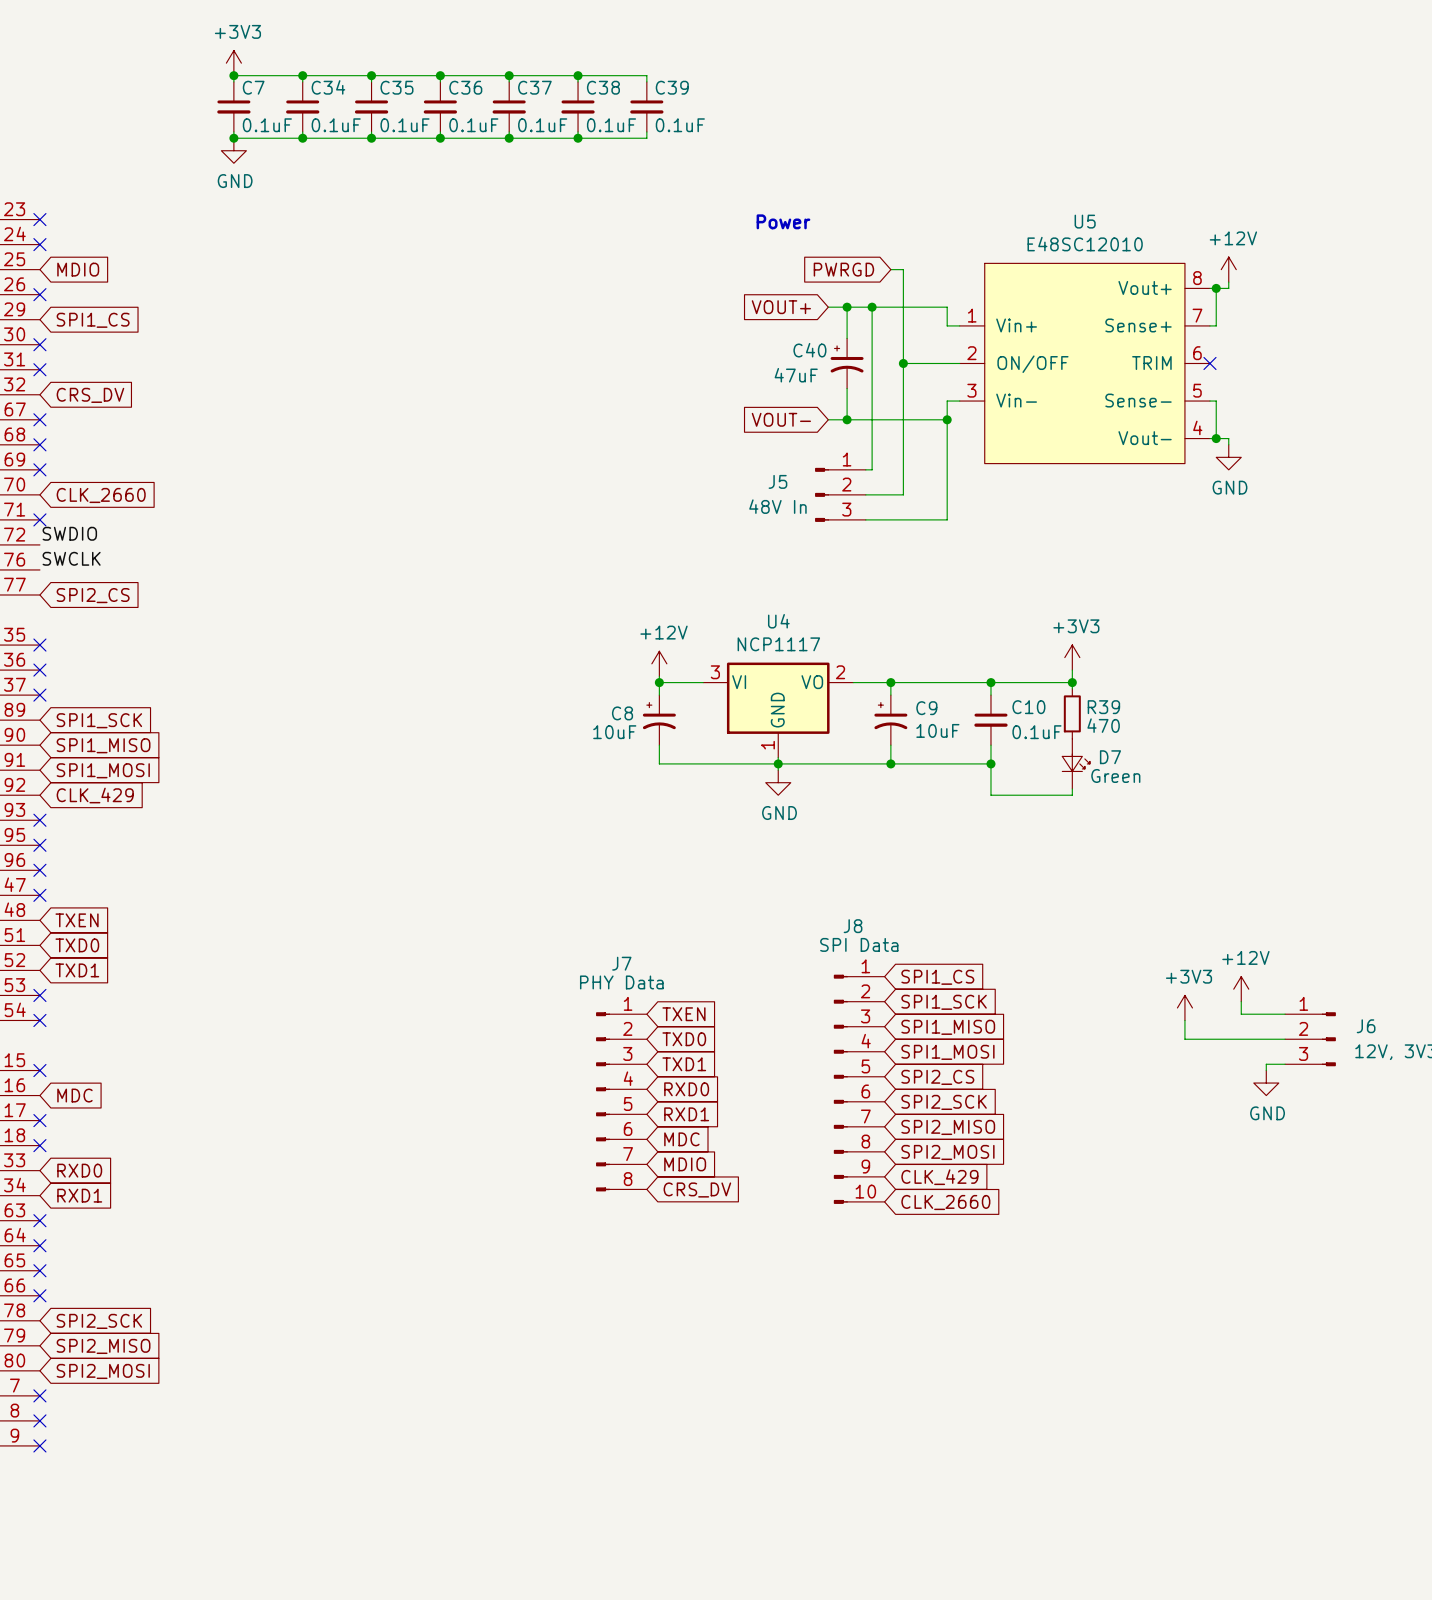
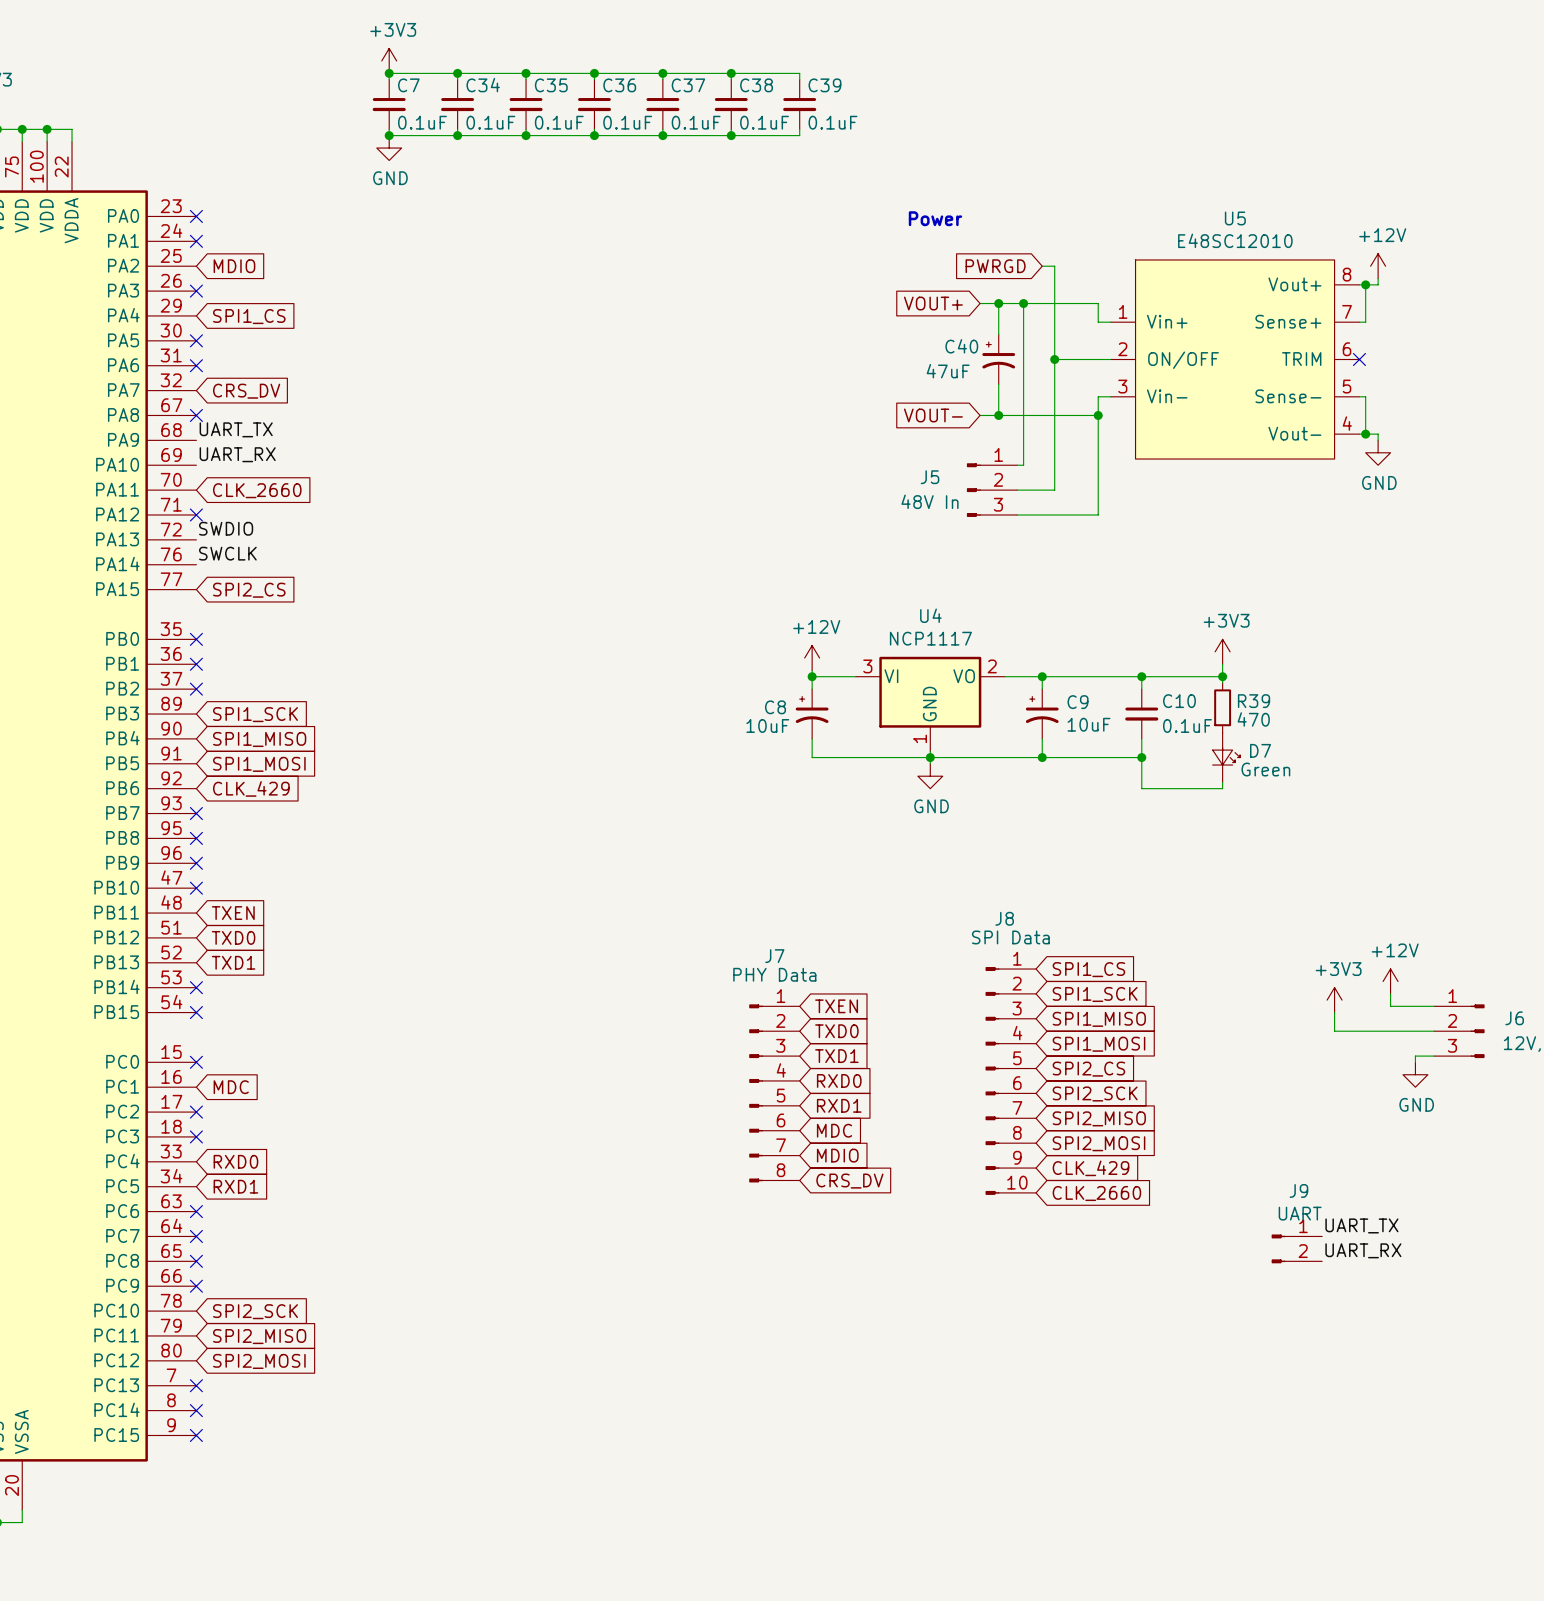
label: none -> UART_TX (236, 429)
no-connect mark: (39, 444) -> none
label: none -> UART_RX (237, 454)
no-connect mark: (39, 469) -> none
label: none -> UART_TX (1361, 1225)
J9: none -> UART (1296, 1248)
label: none -> UART_RX (1363, 1250)

